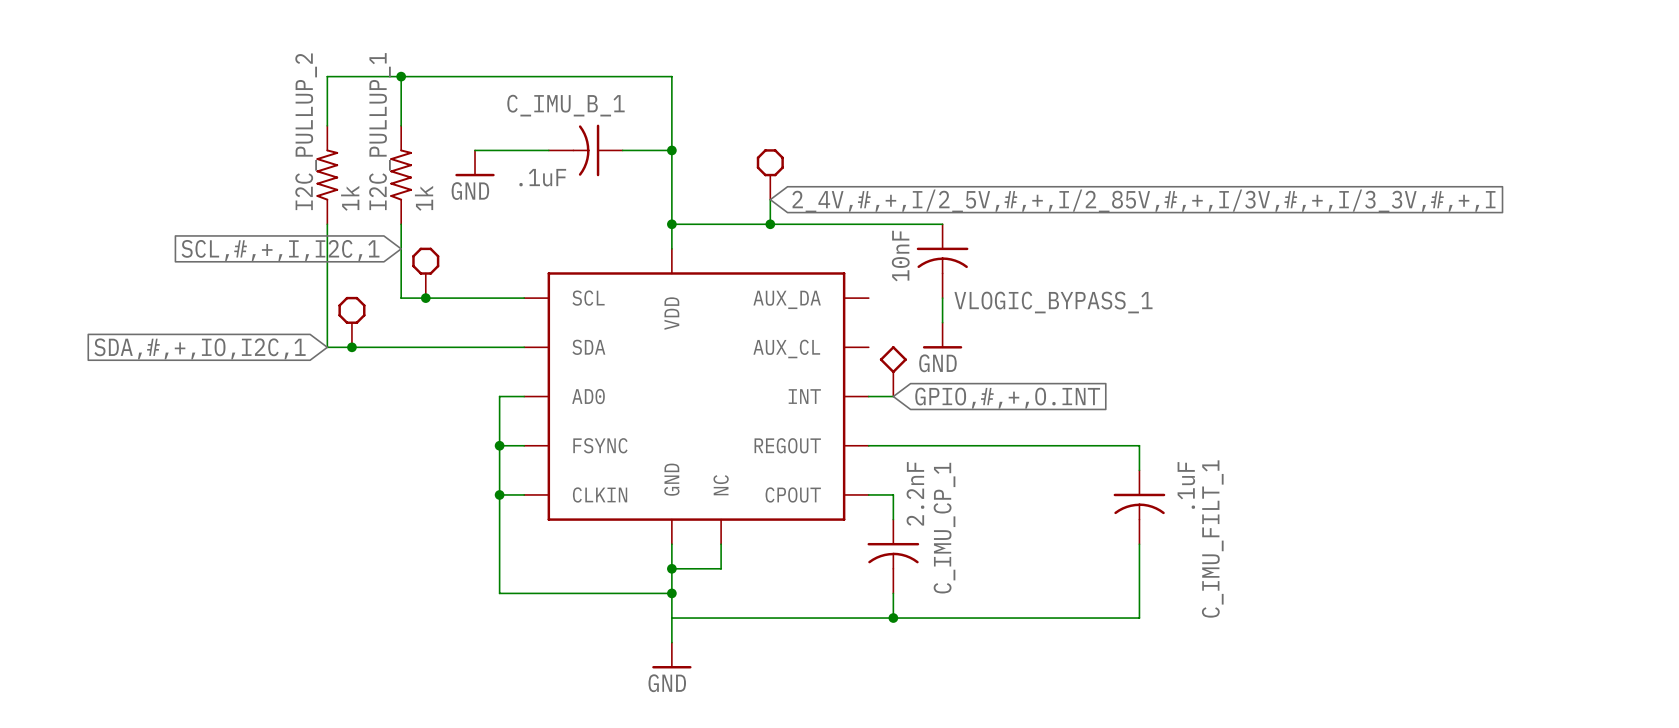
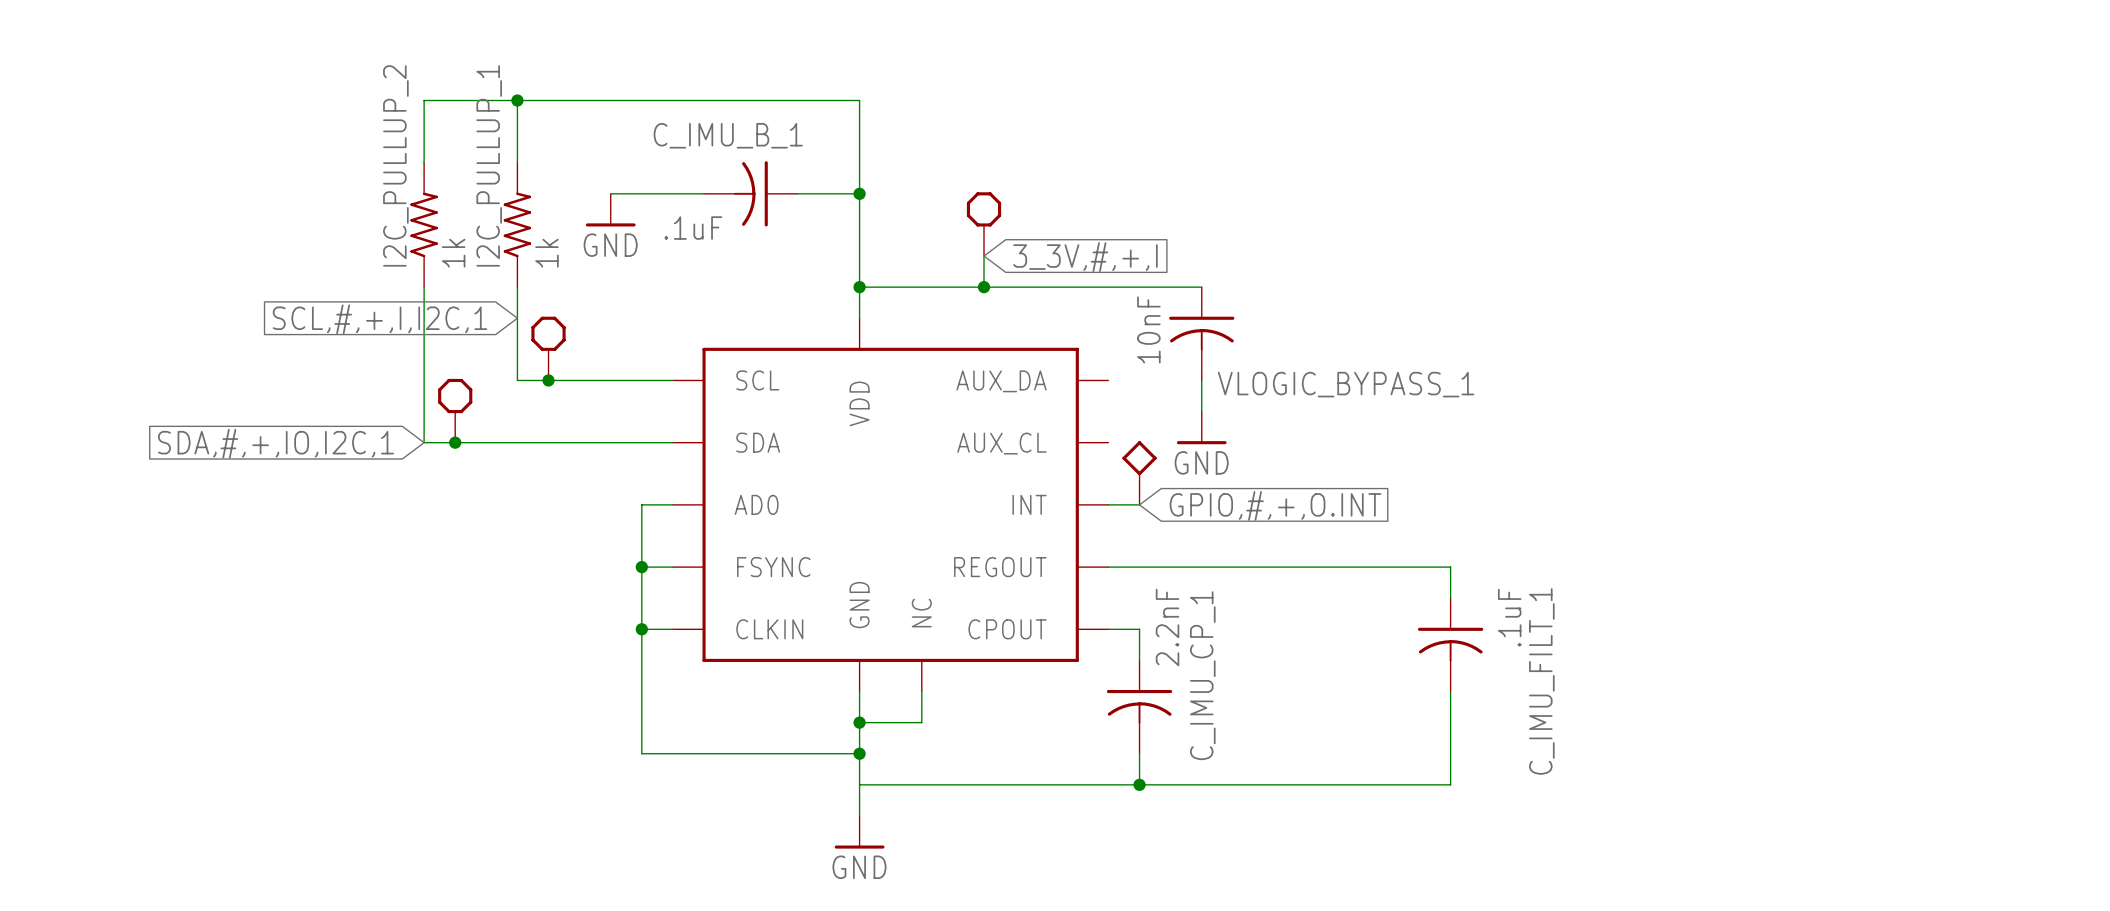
global label: 2_4V,#,+,I/2_5V,#,+,I/2_85V,#,+,I/3V,#,+,I/3_3V,#,+,I (1143, 200) -> 3_3V,#,+,I (1085, 257)

